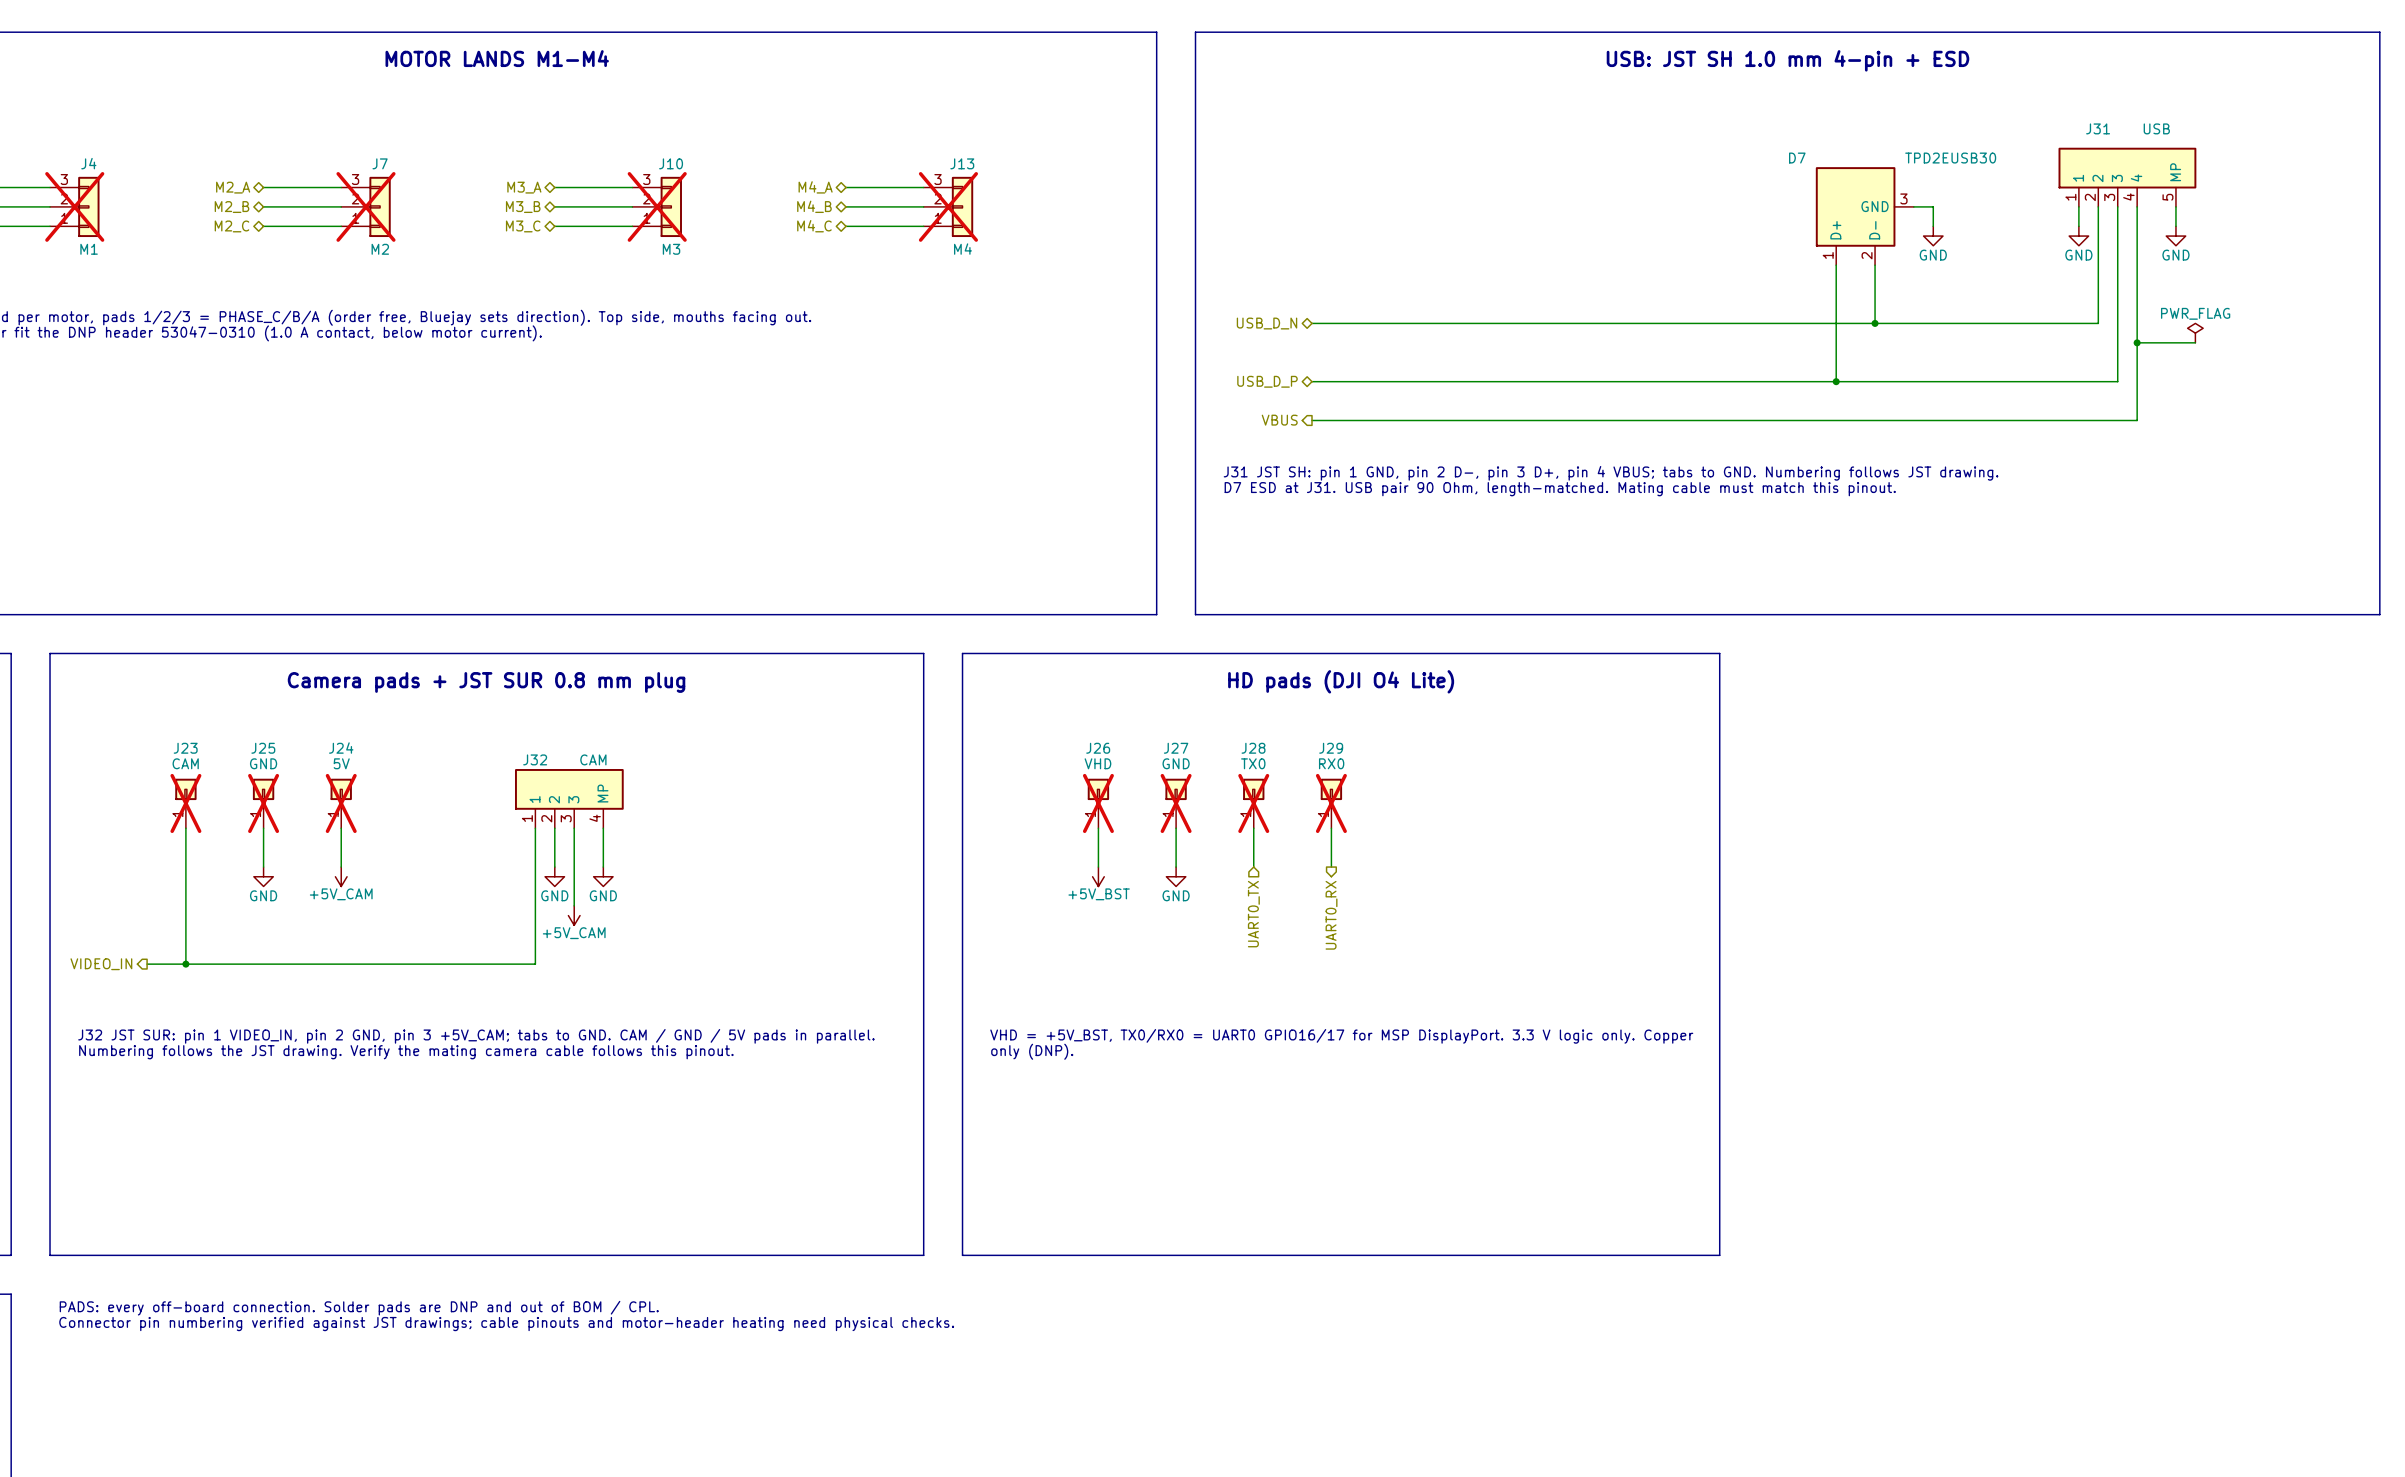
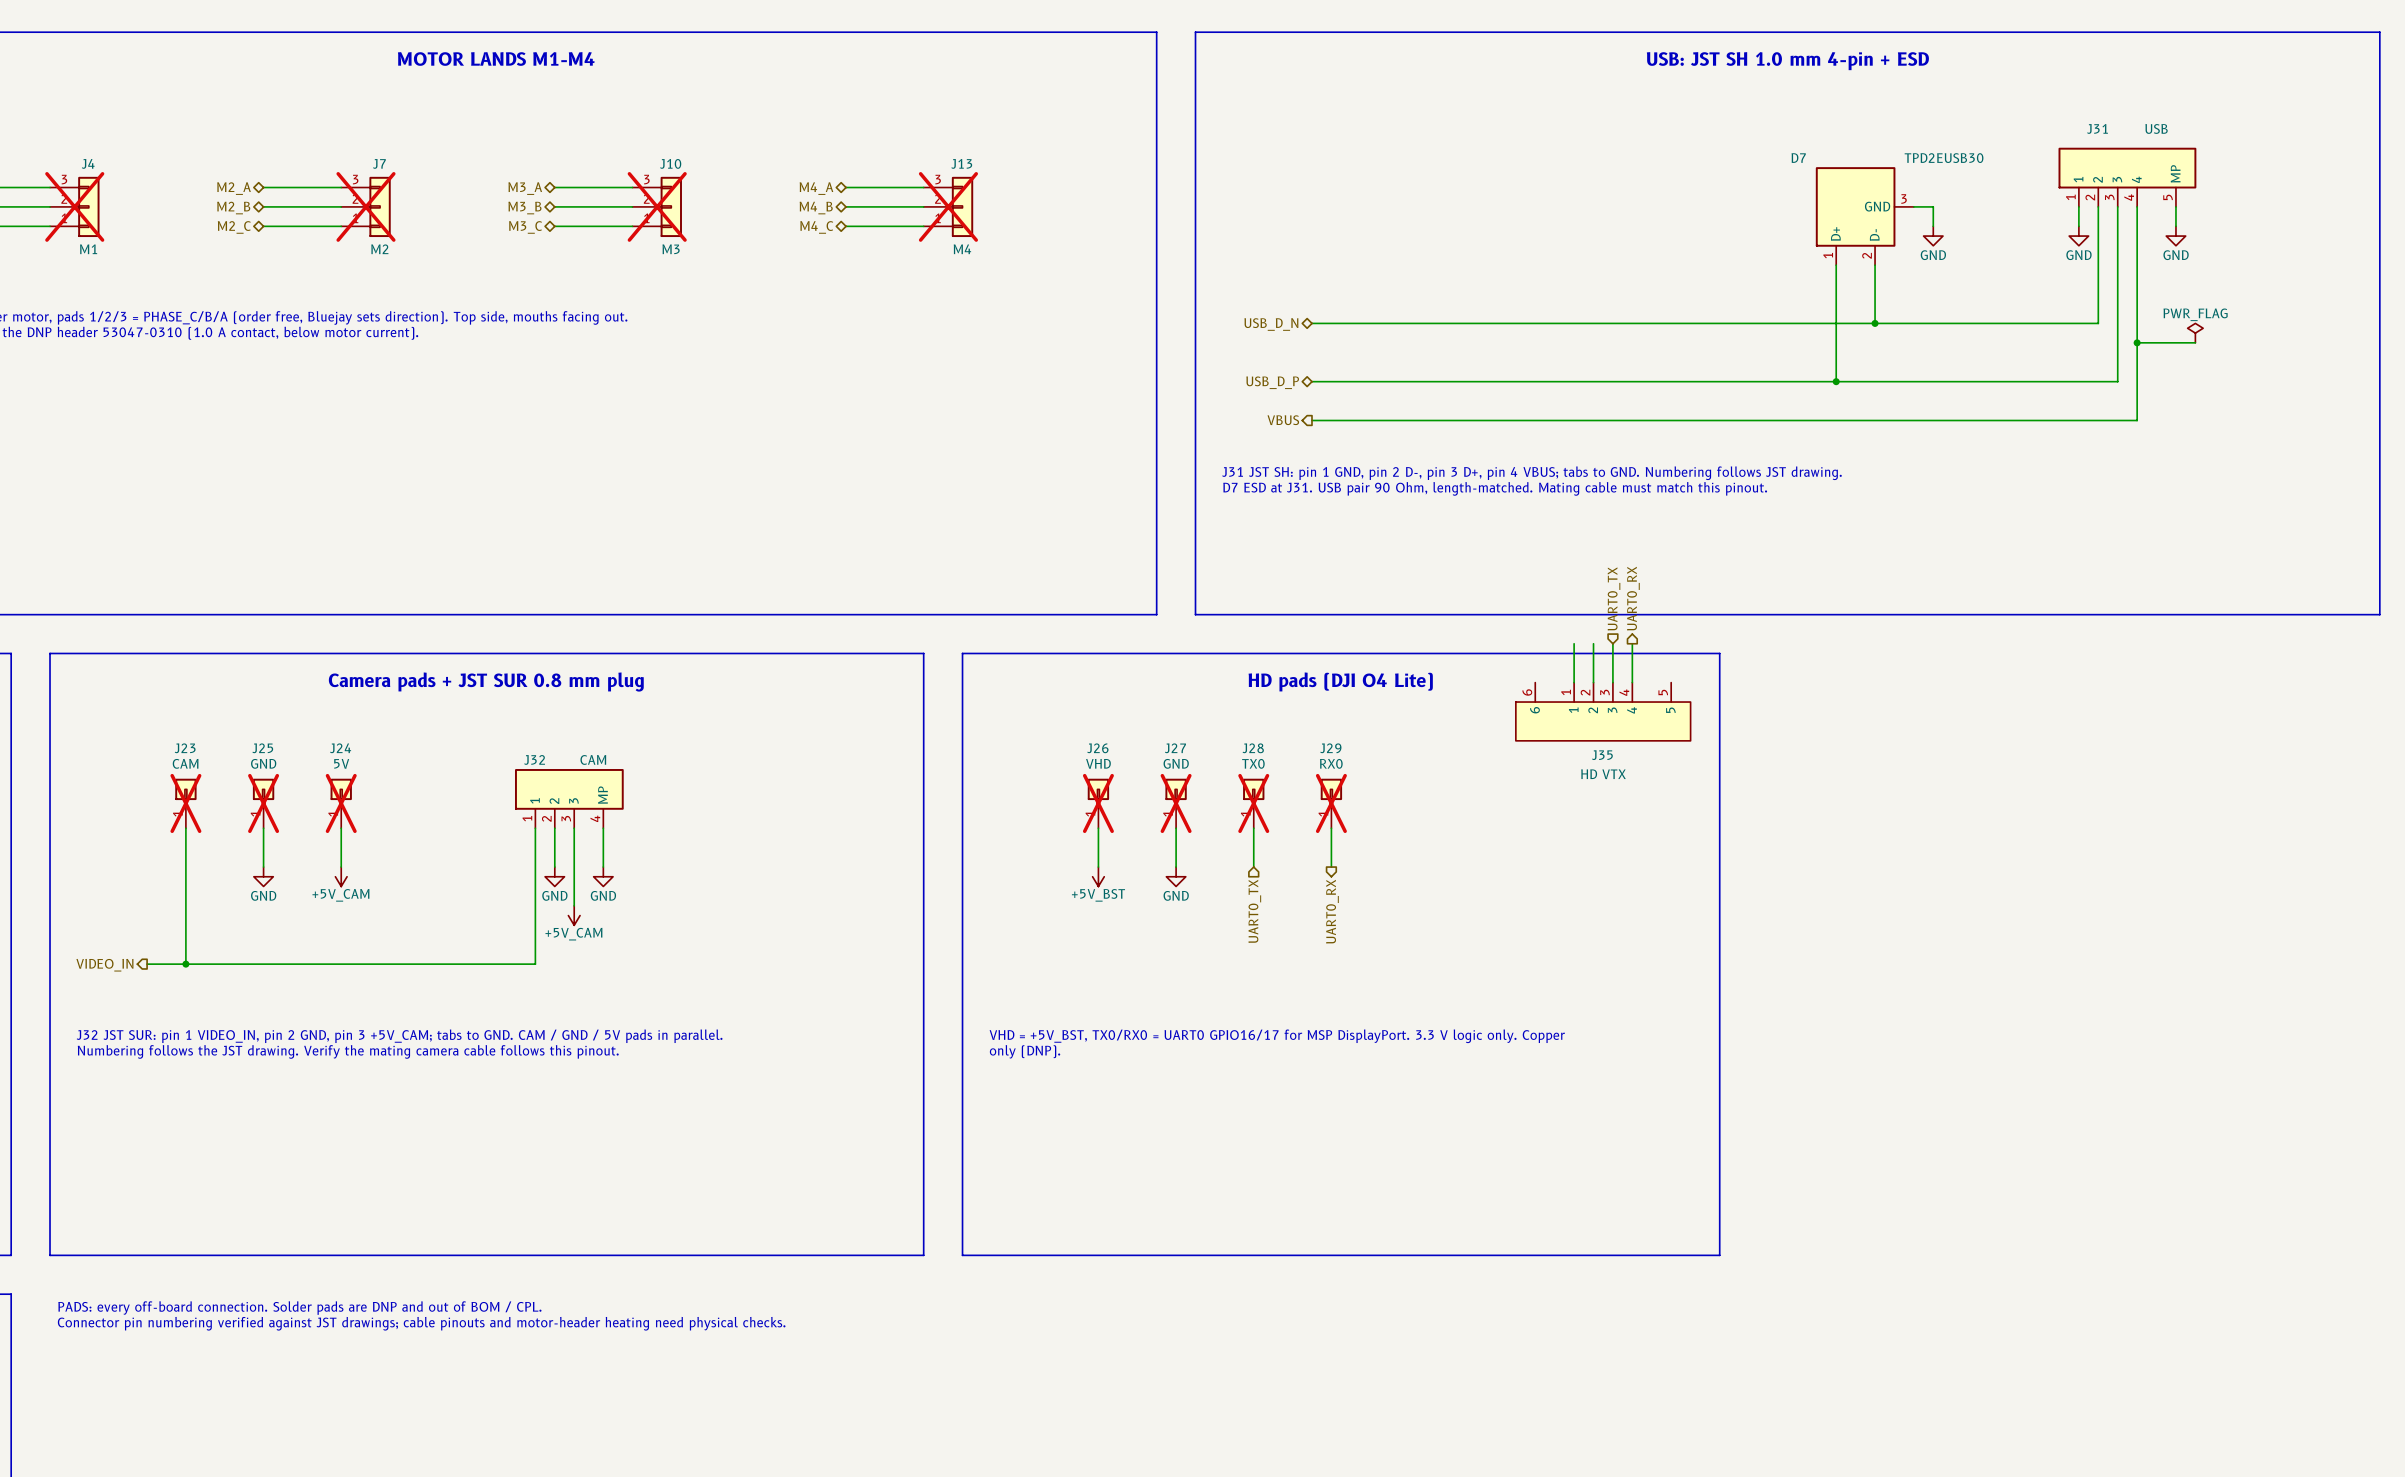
hierarchical label: none -> UART0_RX (1633, 598)
hierarchical label: none -> UART0_TX (1614, 598)
wire: none -> (1574, 643) (1574, 682)
wire: none -> (1593, 643) (1593, 682)
wire: none -> (1612, 643) (1612, 682)
wire: none -> (1632, 643) (1632, 682)
J35: none -> HD VTX (1603, 711)

